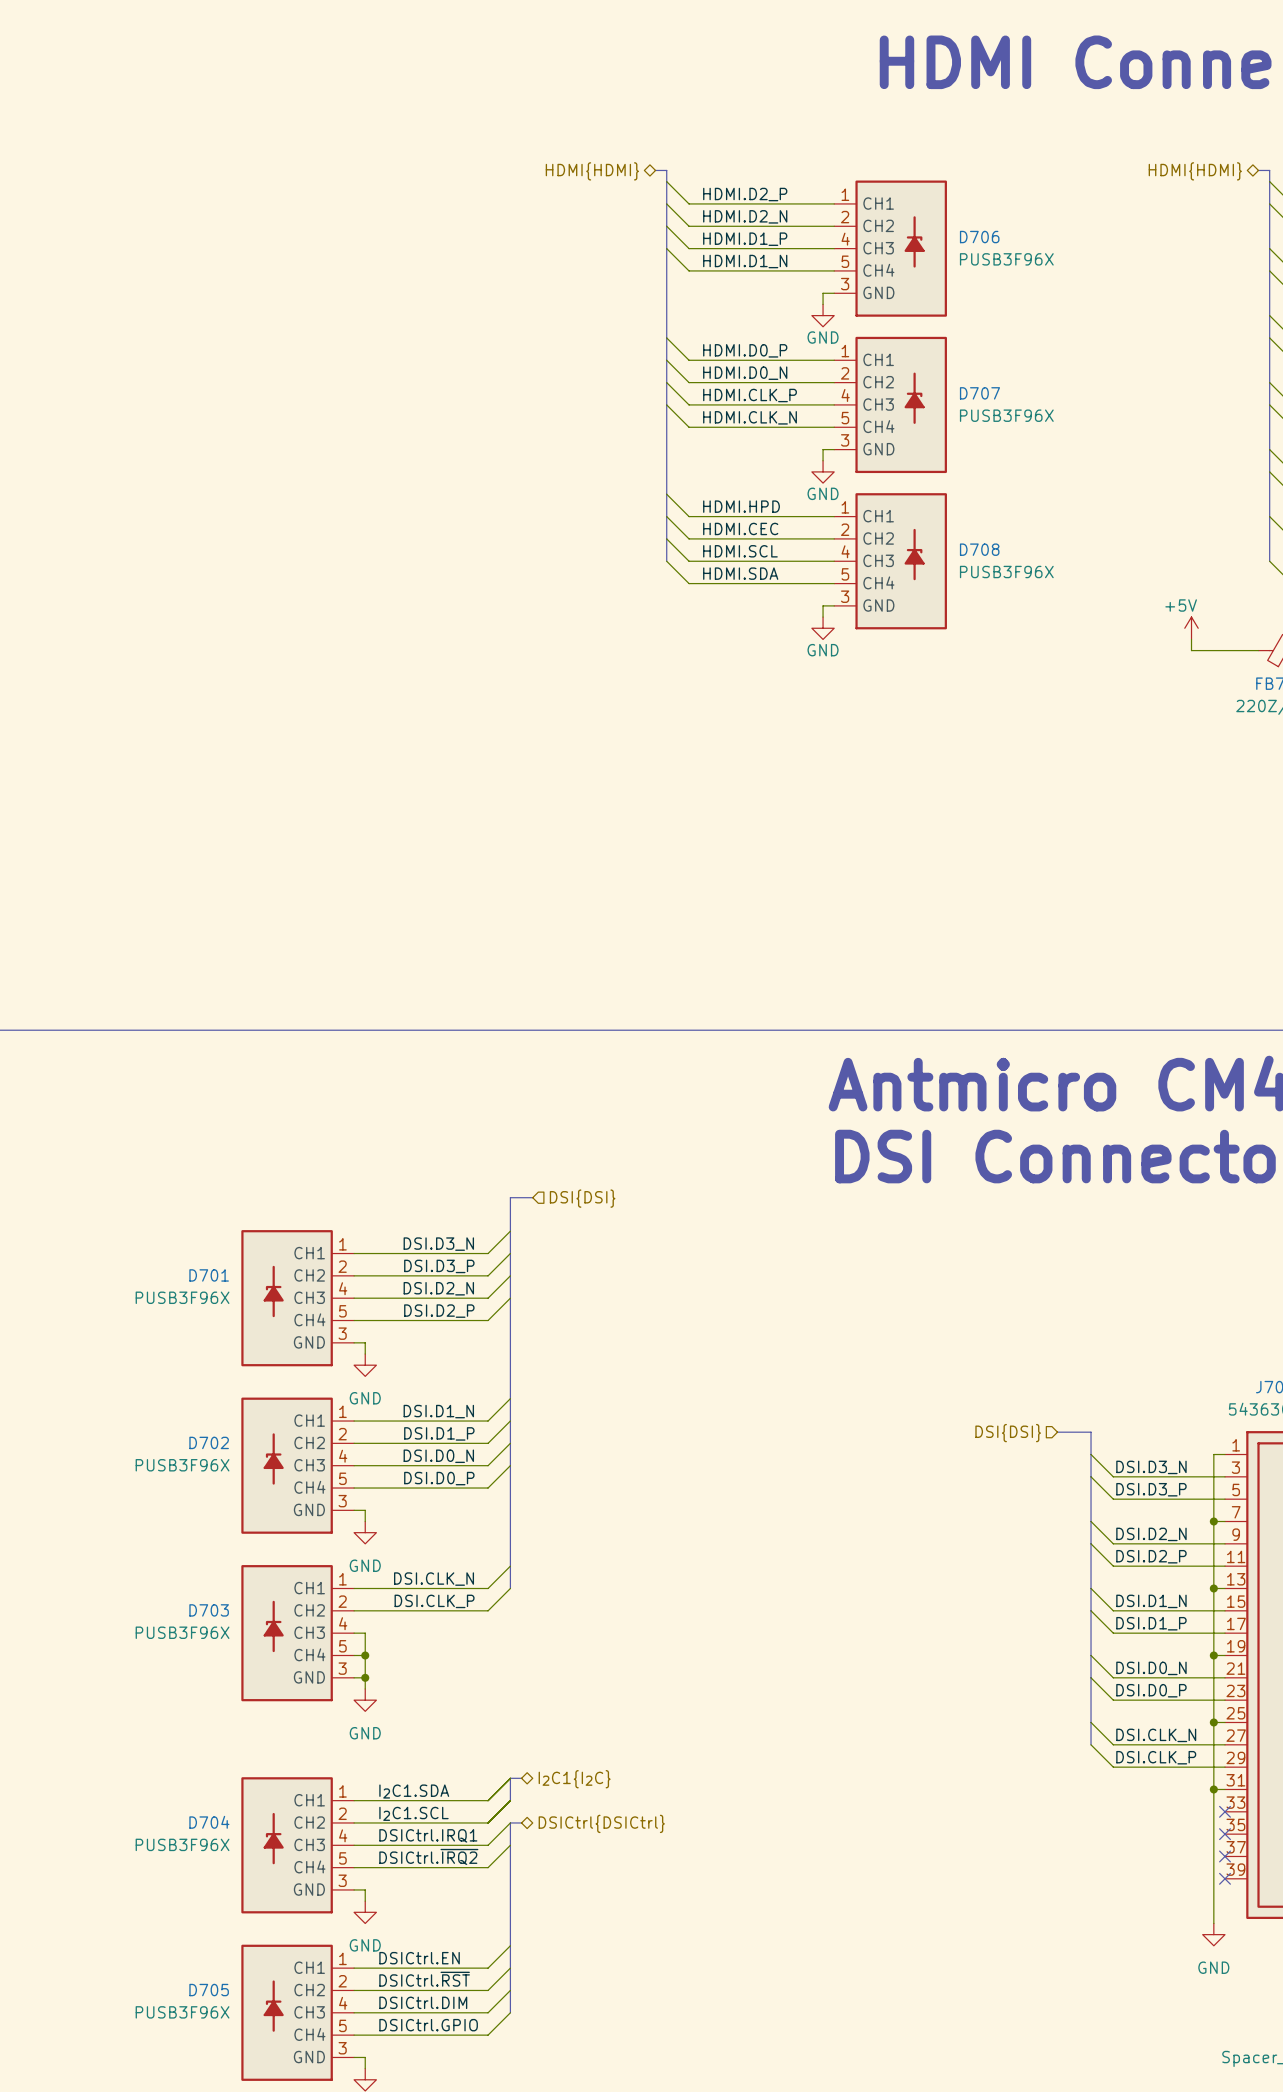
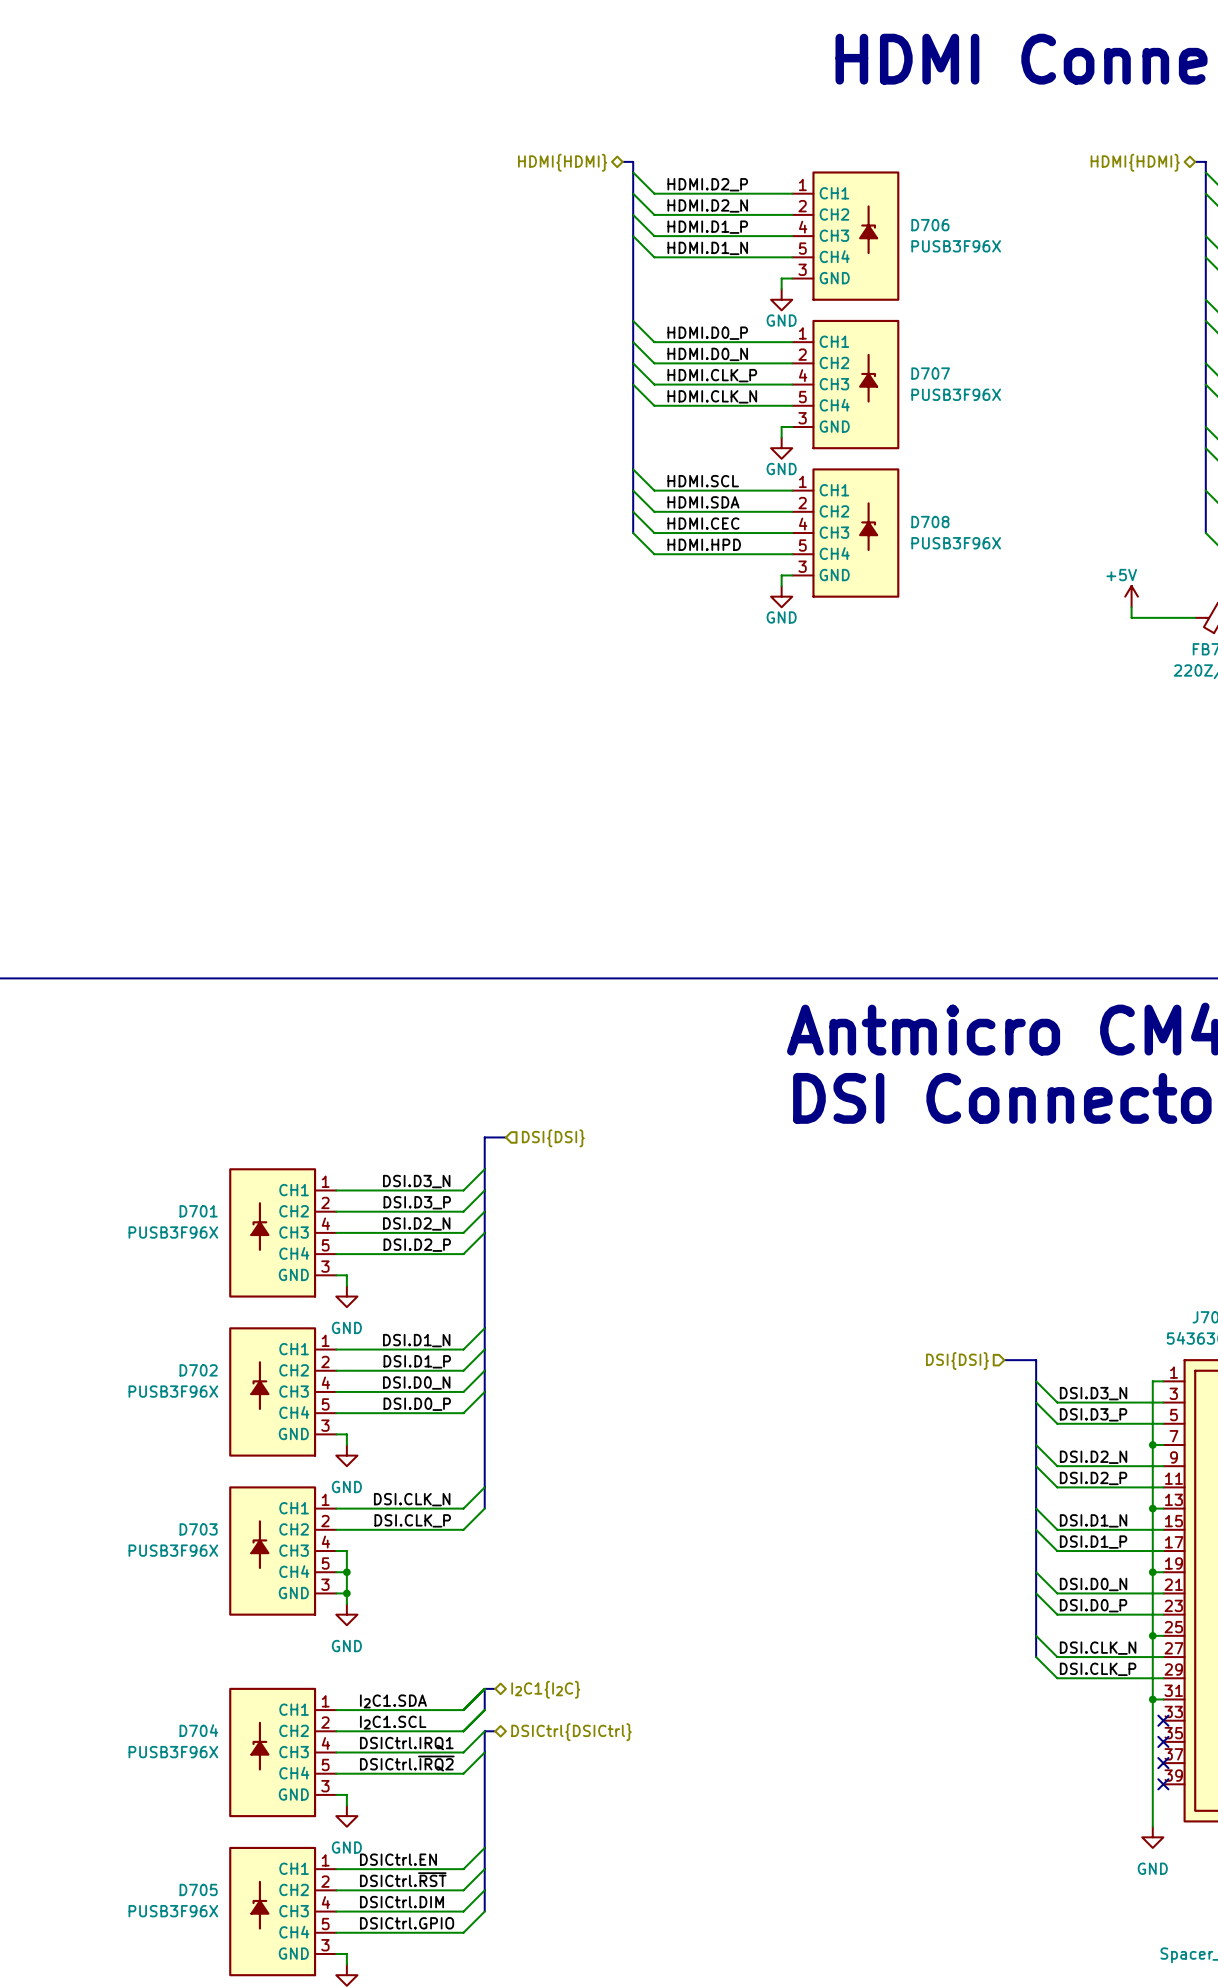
label: HDMI.HPD (741, 506) -> HDMI.SCL (703, 481)
label: HDMI.CEC (740, 528) -> HDMI.SDA (703, 502)
label: HDMI.SCL (740, 551) -> HDMI.CEC (703, 523)
label: HDMI.SDA (740, 573) -> HDMI.HPD (704, 544)

